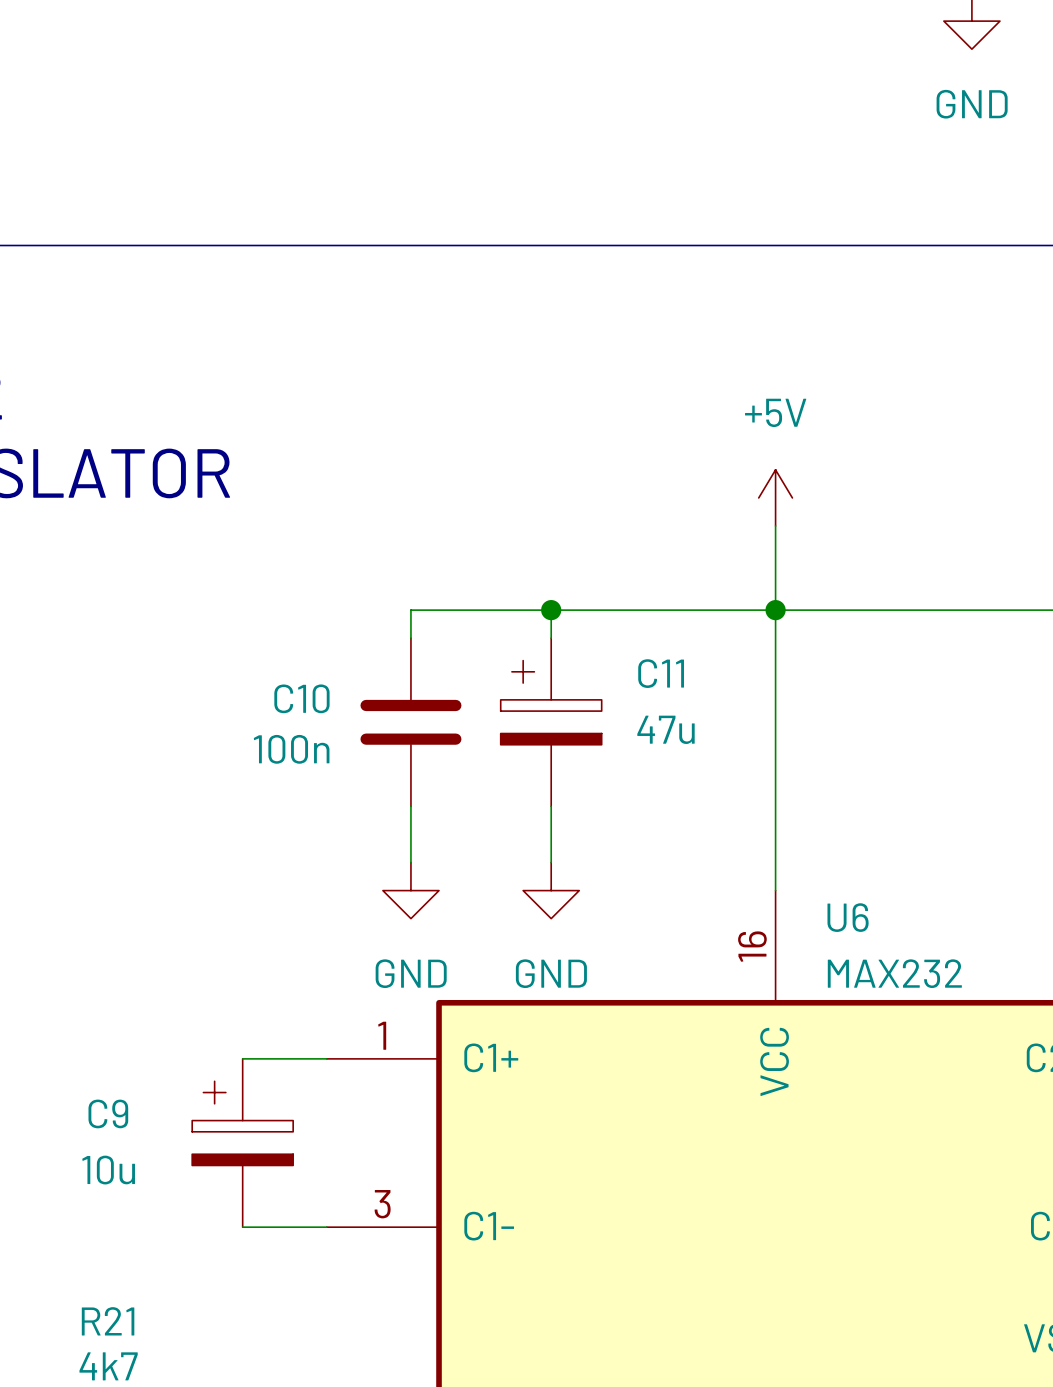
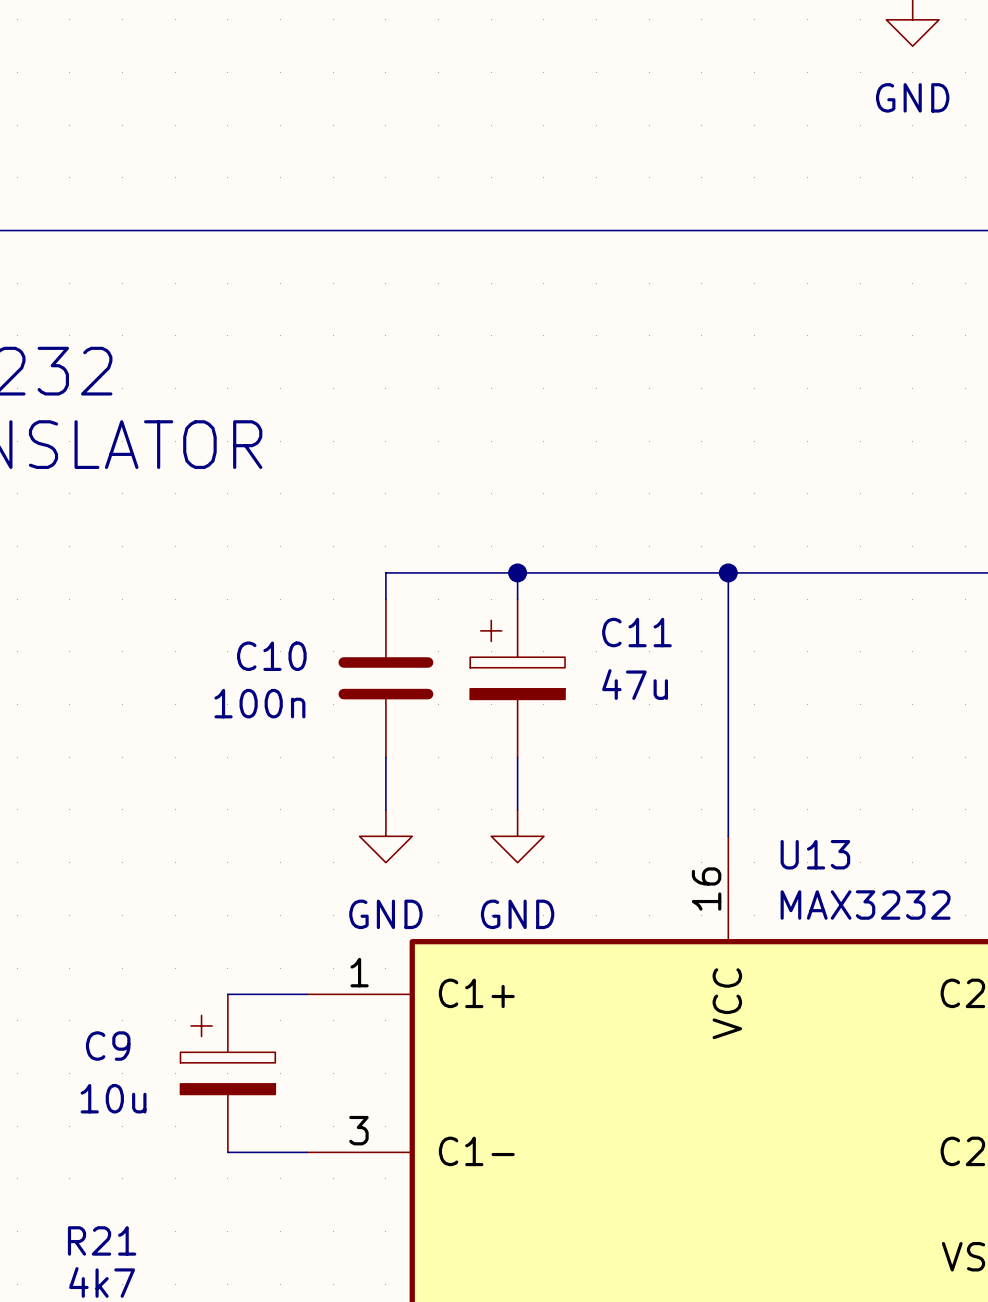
power symbol: +5V (775, 497) -> none
wire: (775, 525) (775, 610) -> none
U6 name: U6 (848, 917) -> U13 (815, 854)
U6 value: MAX232 (894, 973) -> MAX3232 (865, 905)

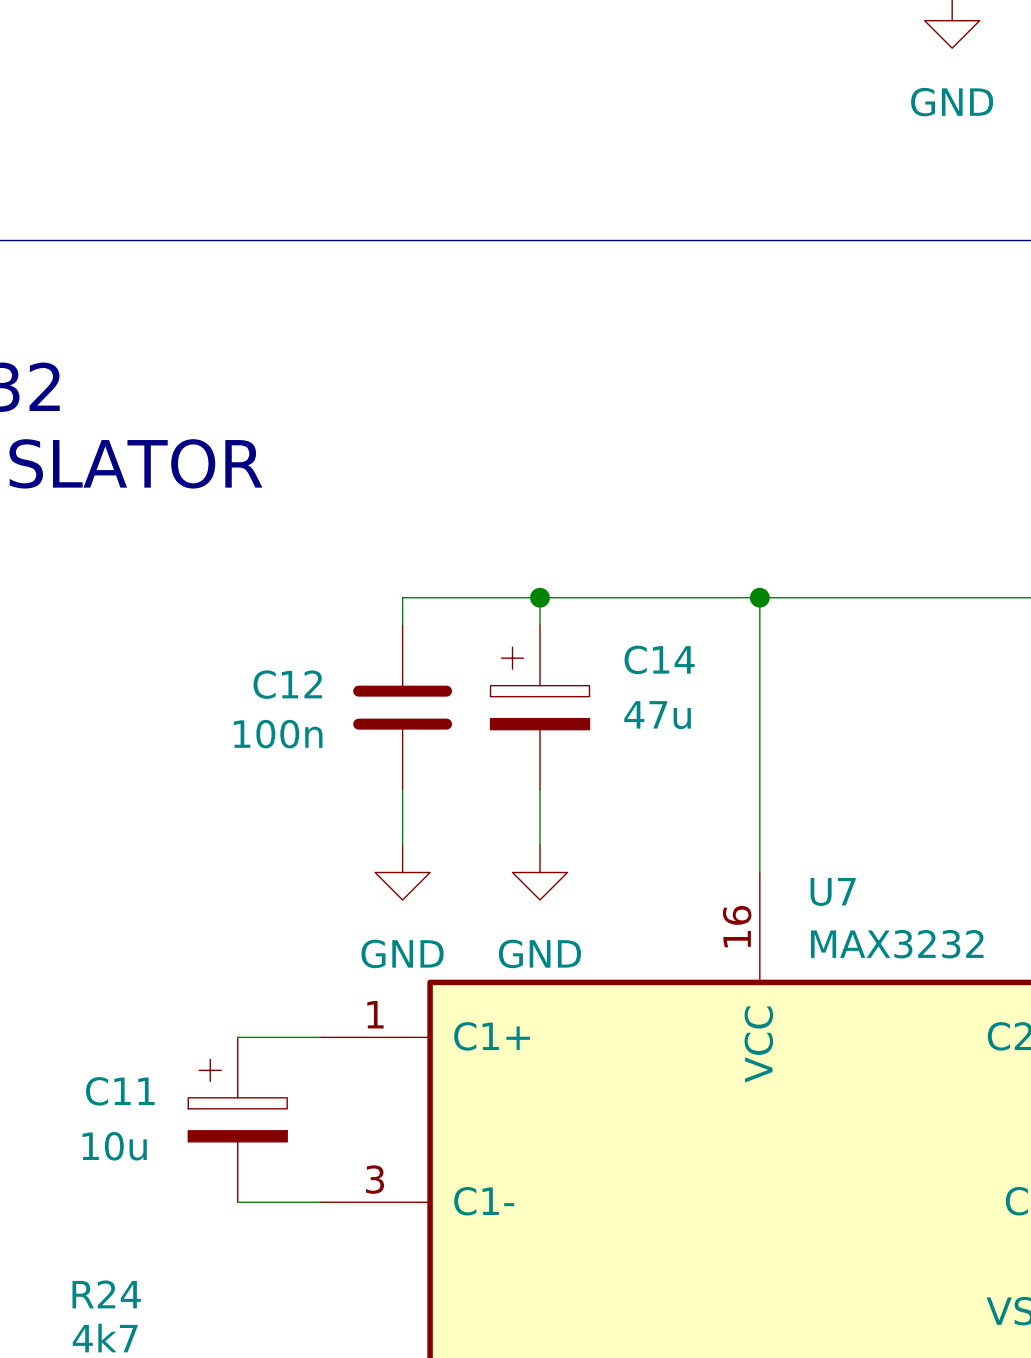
C11 name: C11 (636, 632) -> C14 (659, 659)
C10 name: C10 (271, 656) -> C12 (287, 684)
U13 name: U13 (815, 854) -> U7 (833, 891)
C9 name: C9 (108, 1046) -> C11 (120, 1091)
R21 name: R21 (102, 1240) -> R24 (106, 1294)

